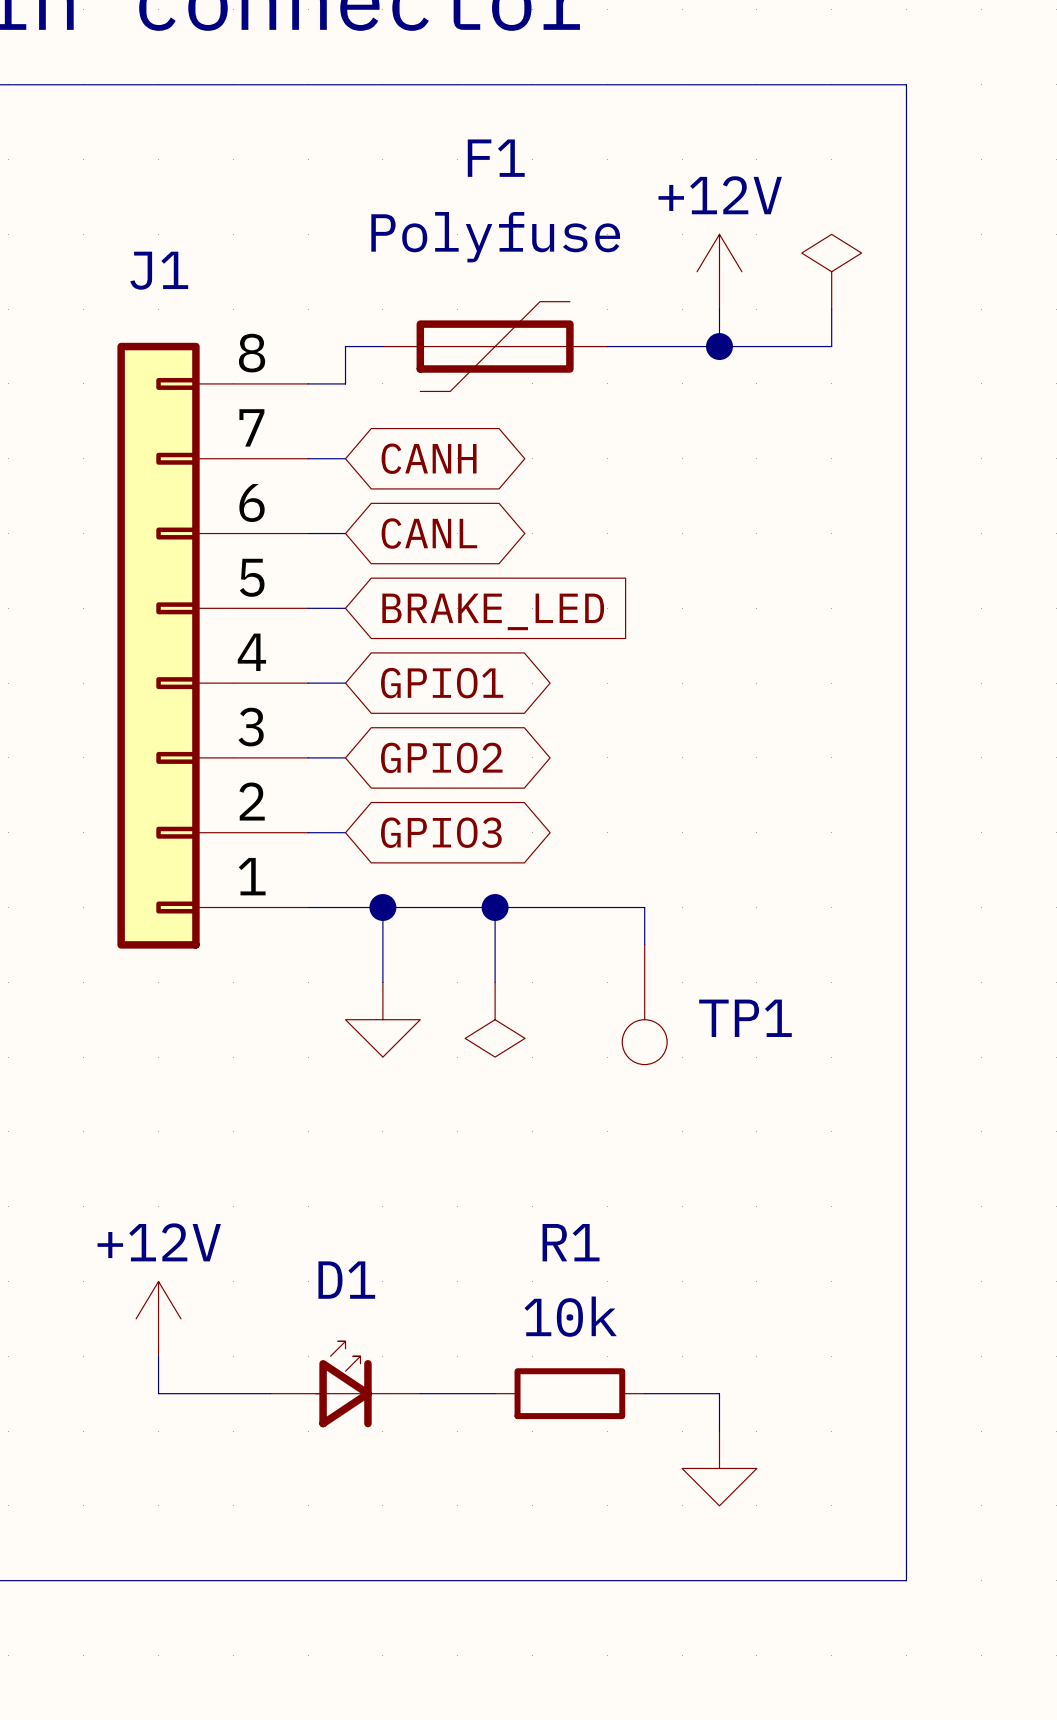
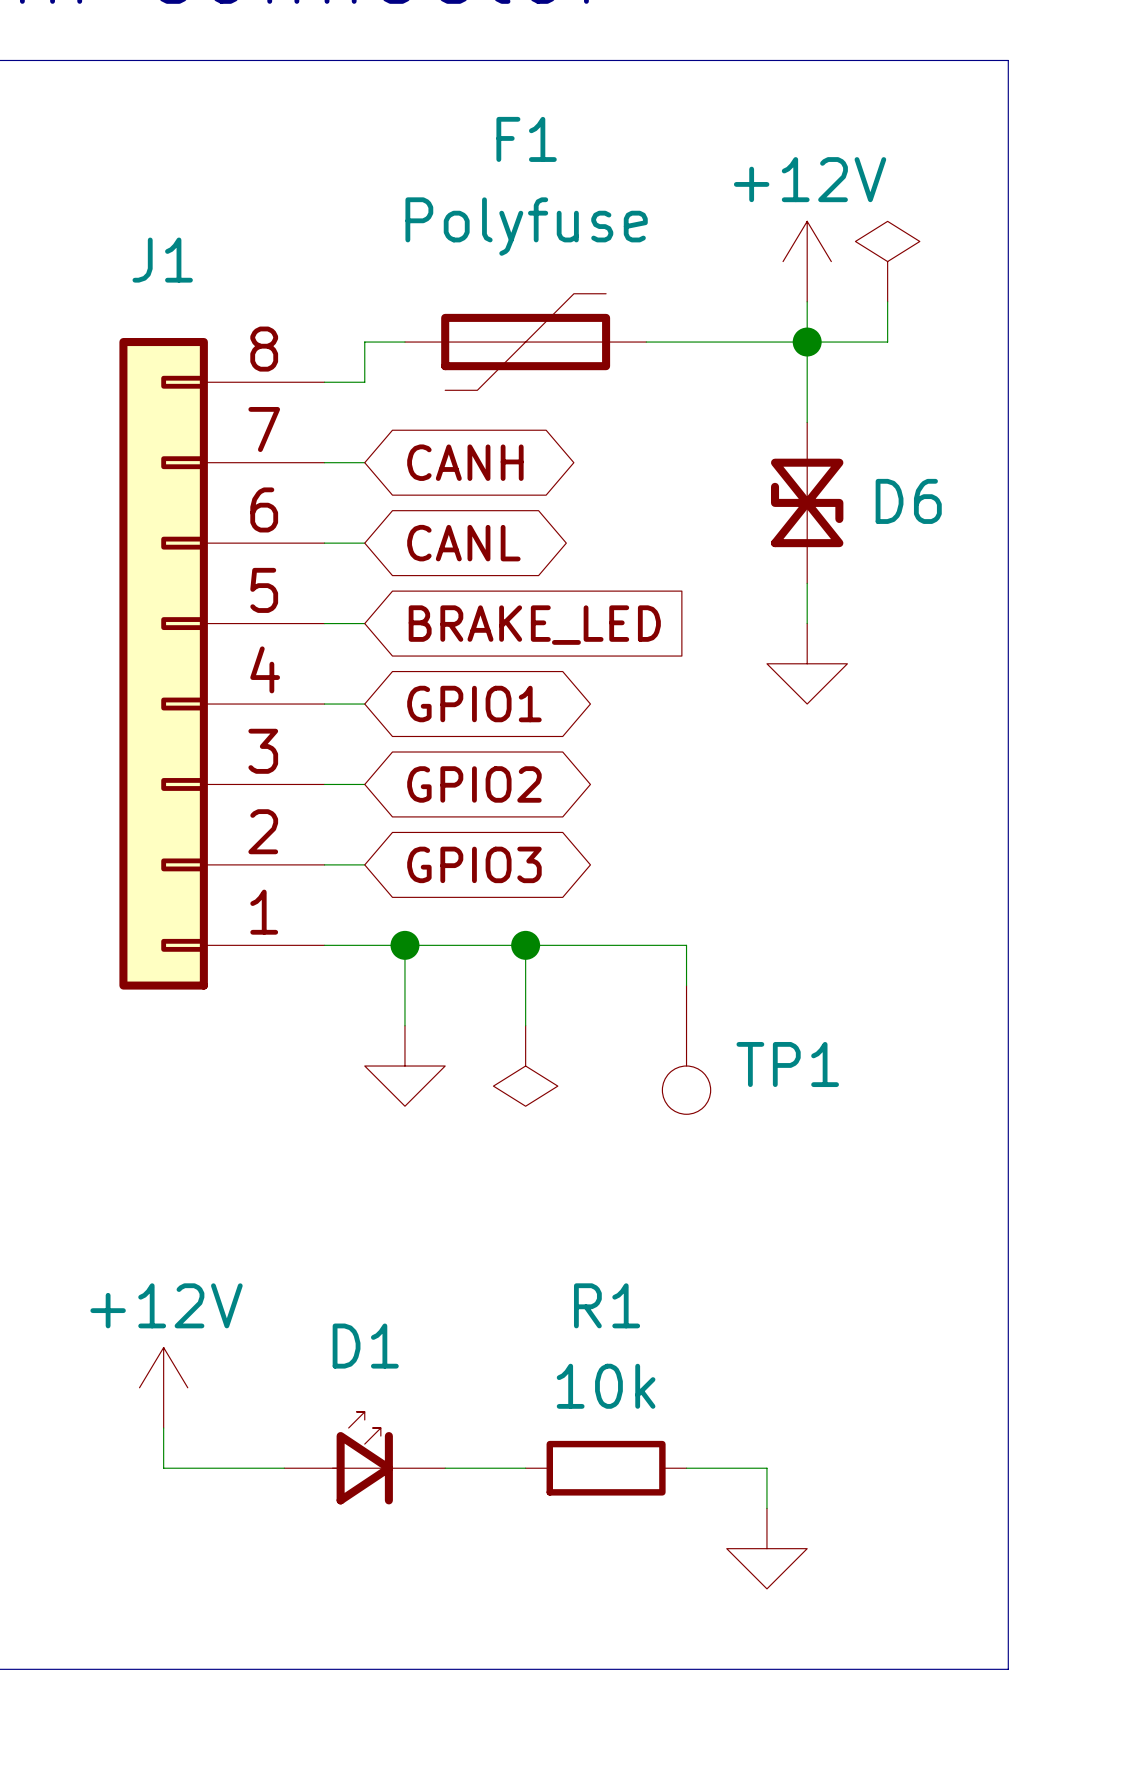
line: (906, 84) (906, 1580) -> (968, 60) (1008, 60) (1008, 1669) (968, 1669)
power symbol position: +12V (719, 271) -> +12V (807, 261)
wire: (719, 309) (719, 346) -> (807, 583) (807, 623)
wire: none -> (807, 301) (807, 422)
junction position: (719, 346) -> (807, 342)
D6: none -> (807, 502)
power symbol: none -> (807, 663)

